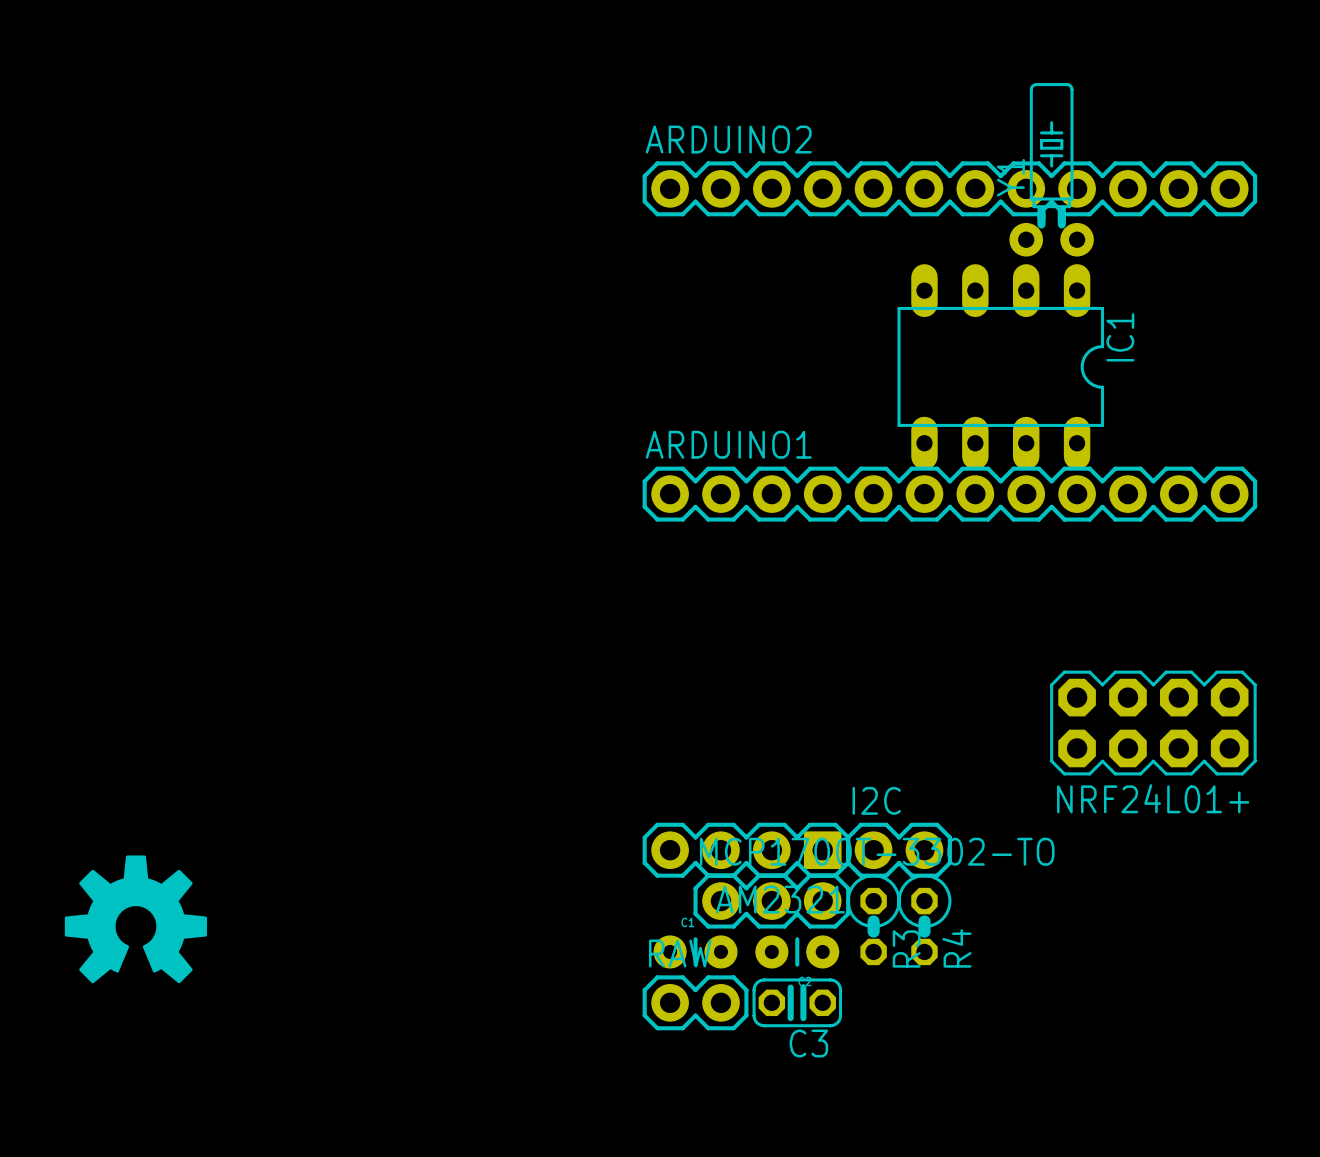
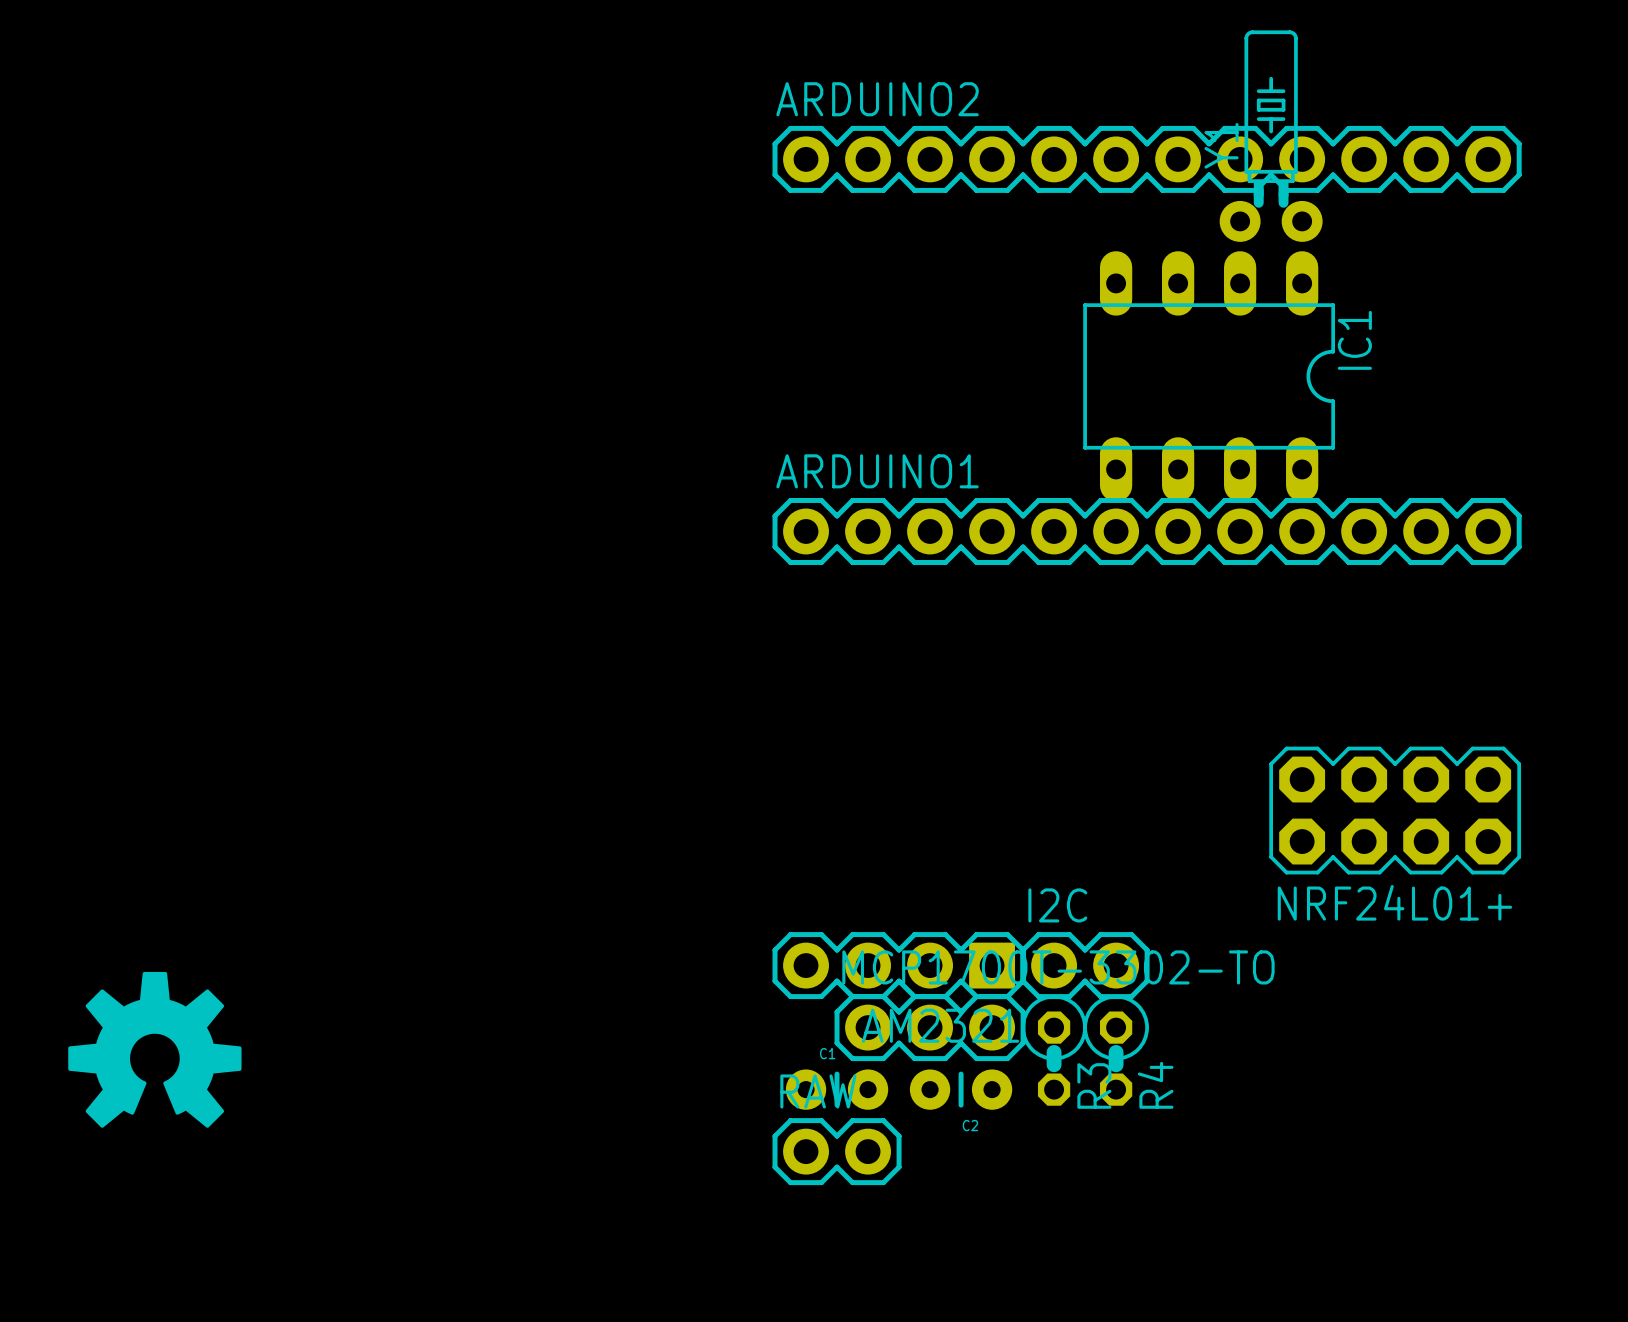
C3: (797, 1002) -> none

